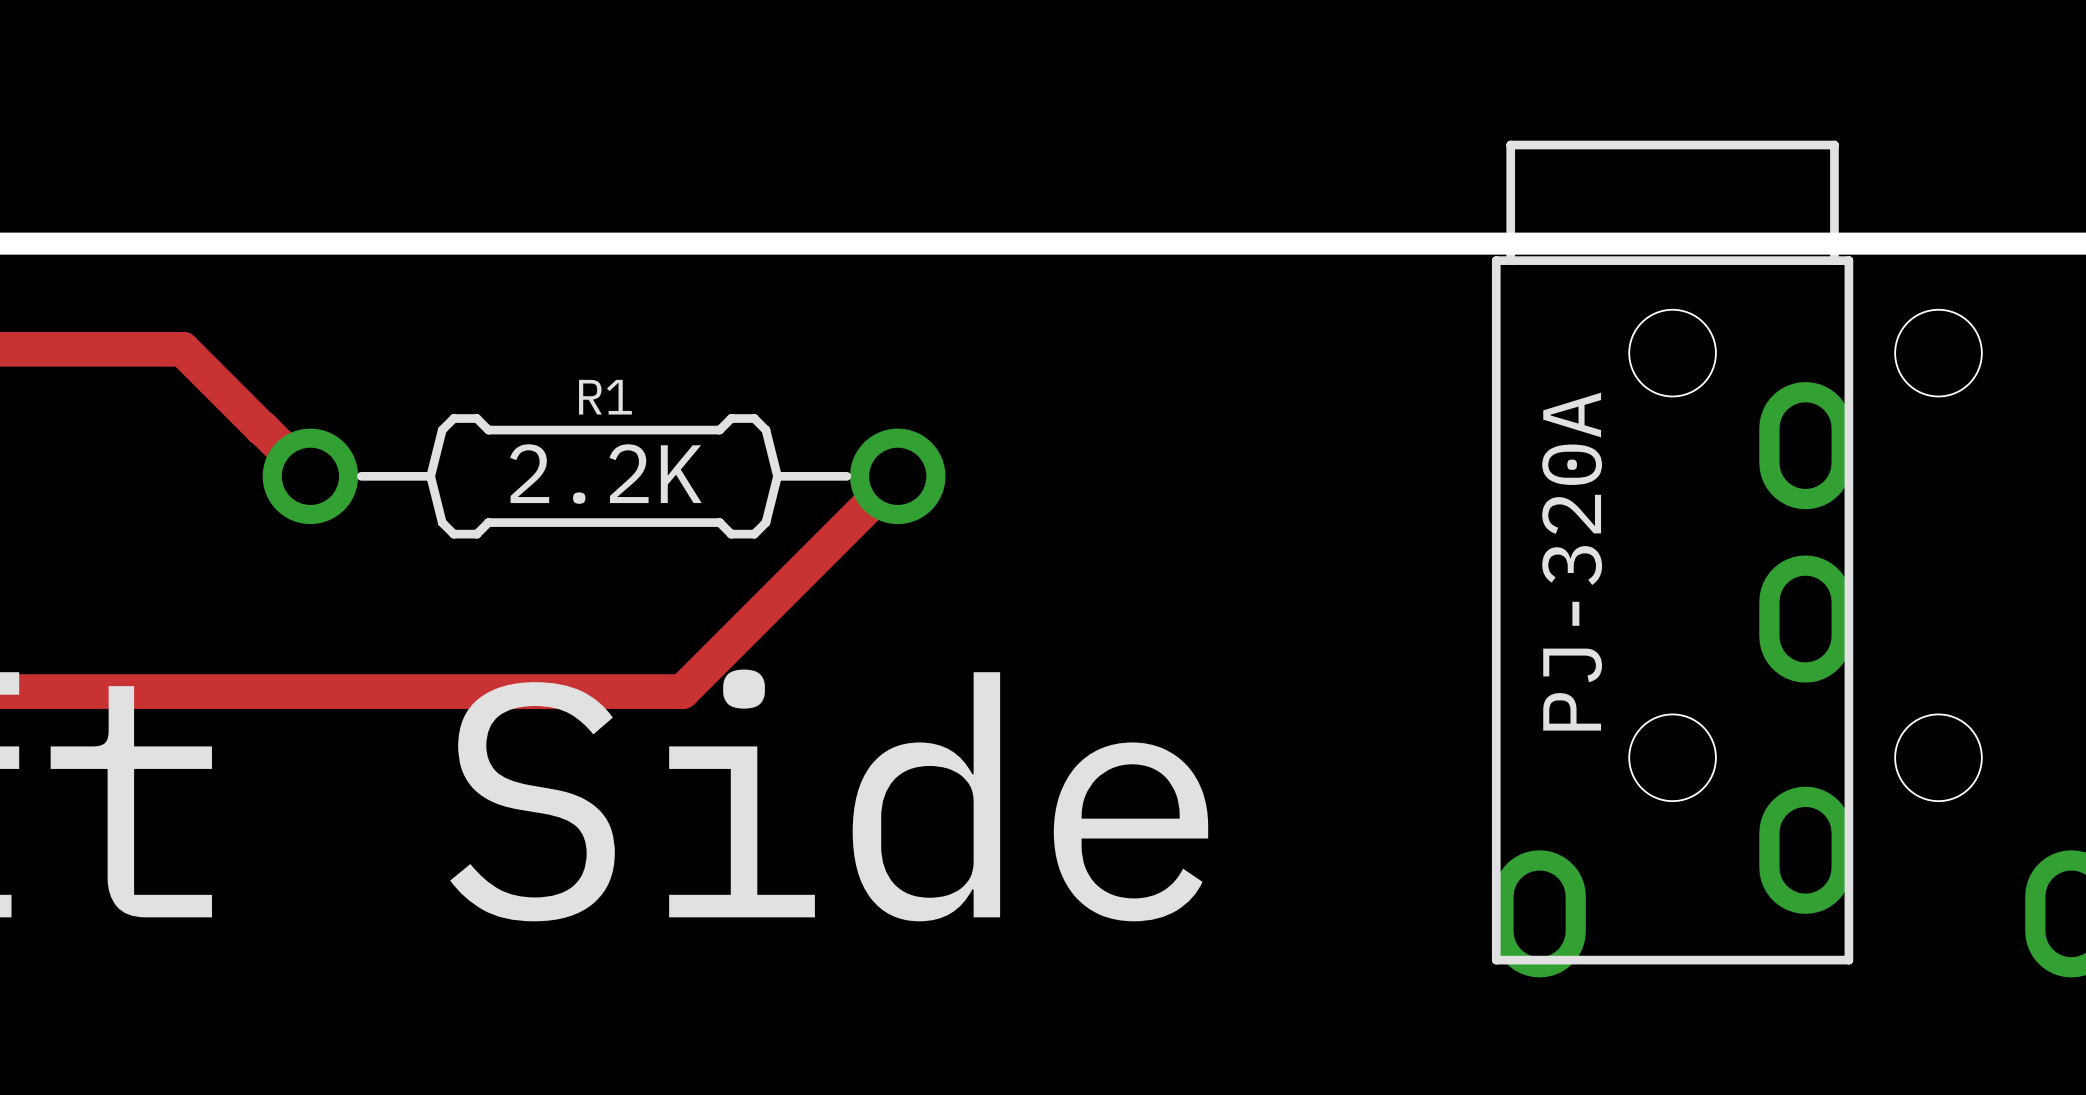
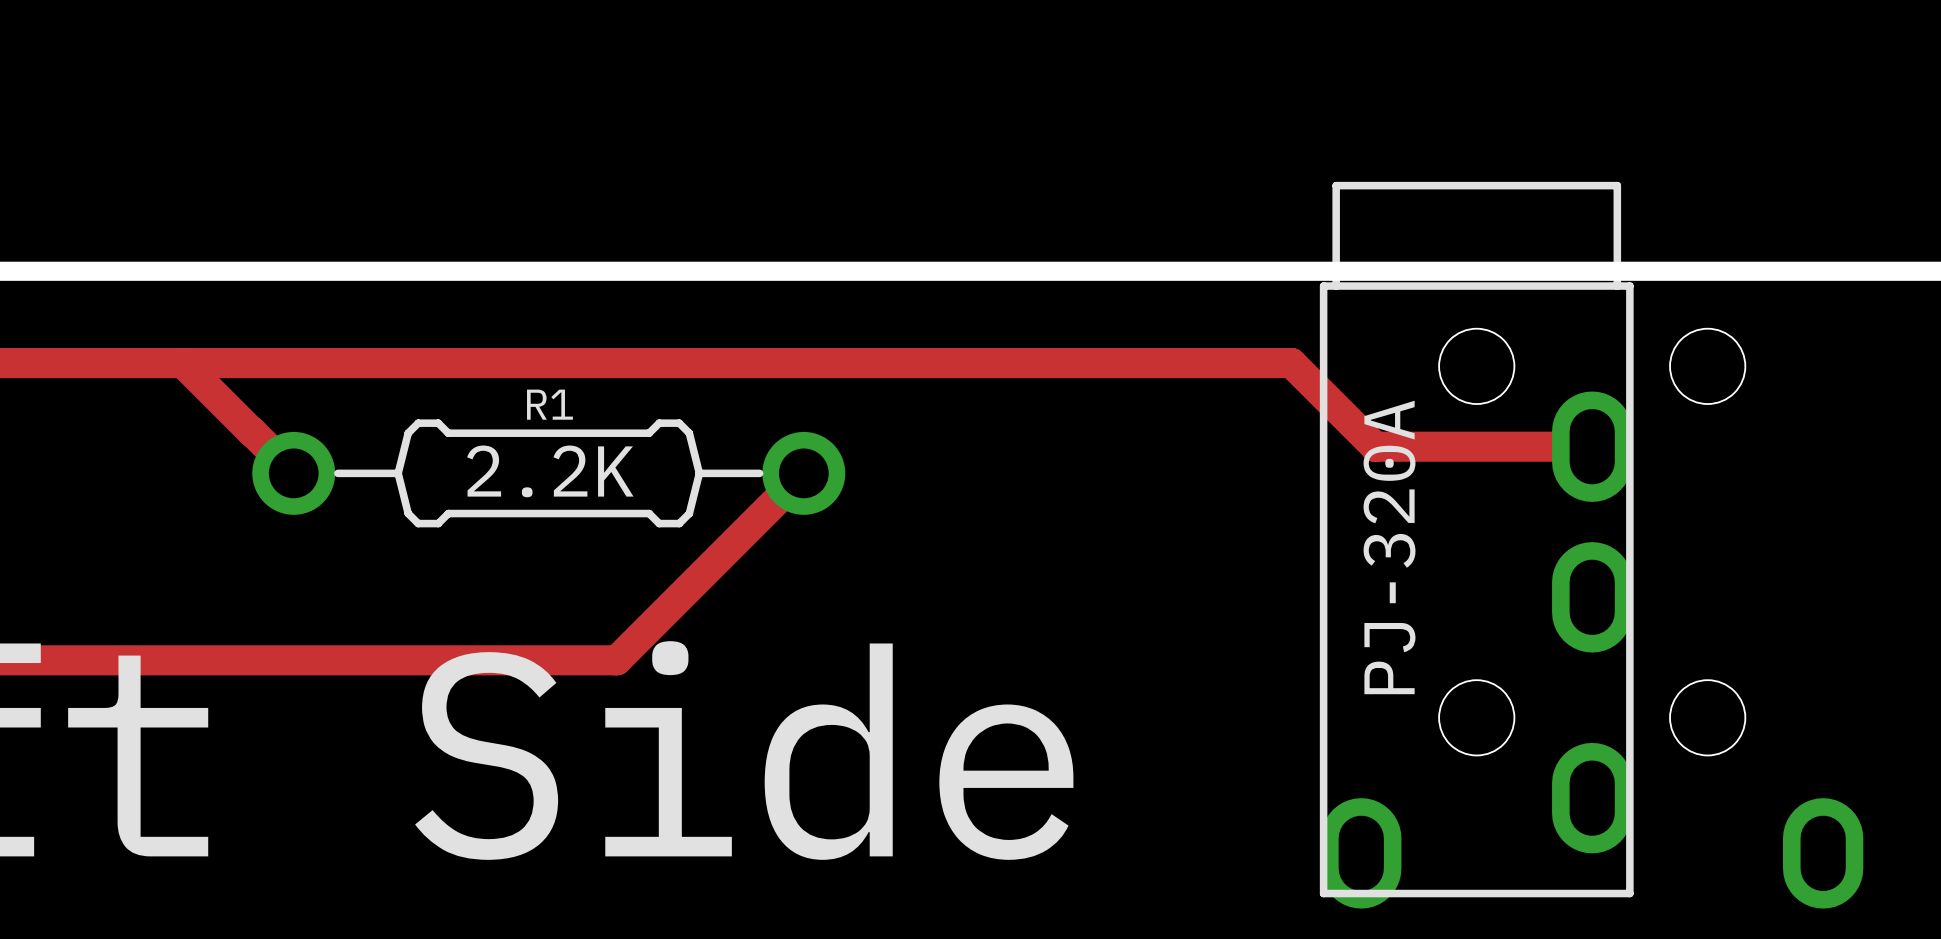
track: none -> (182, 363) (1291, 363) (1375, 446)
track: none -> (1375, 446) (1592, 446)

